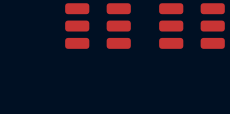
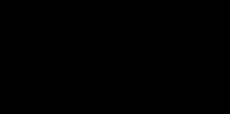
part: (97, 26) -> none
part: (191, 26) -> none

